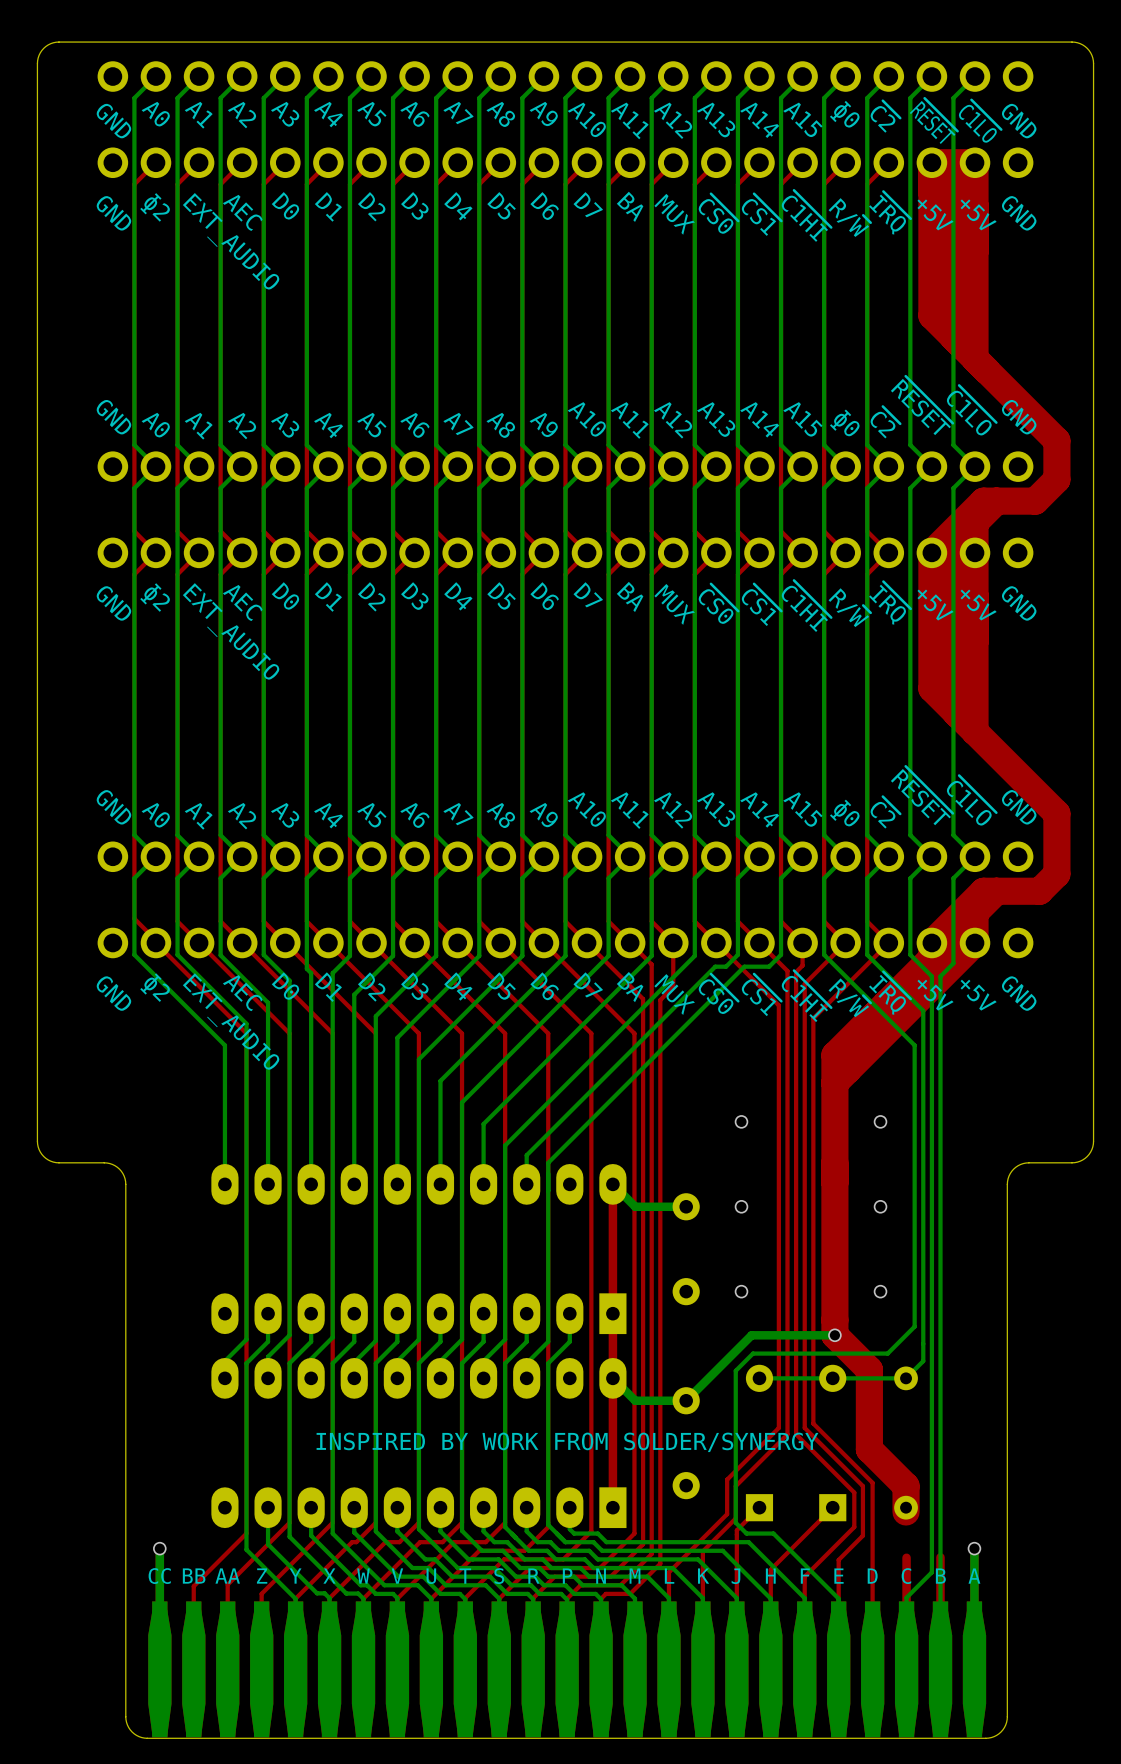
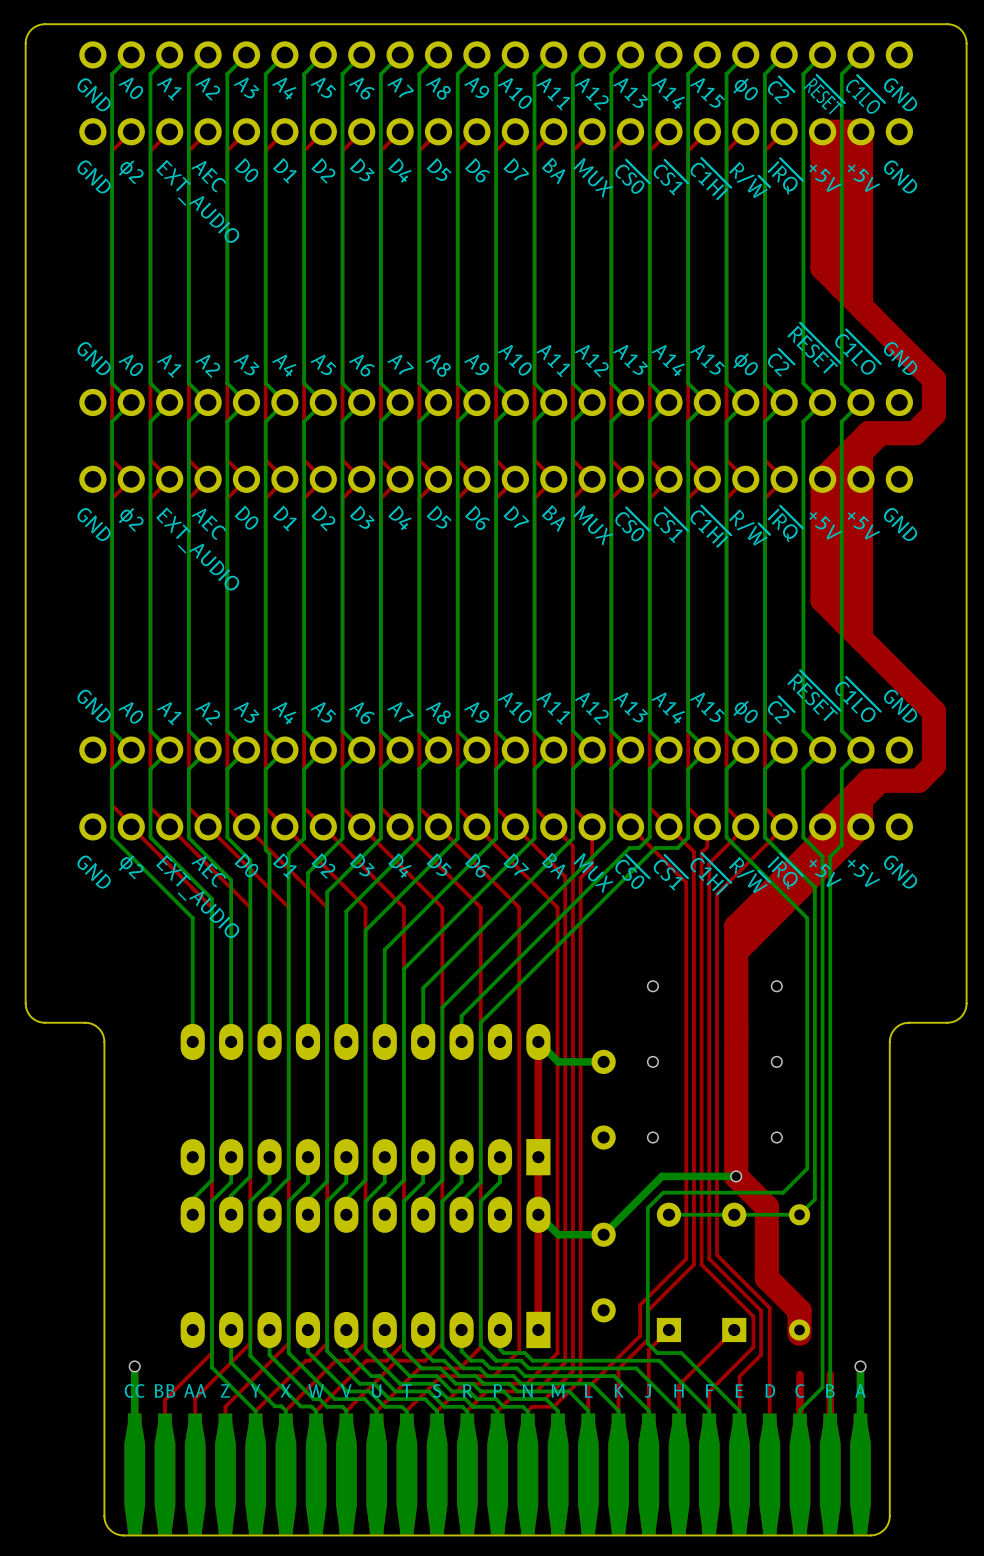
text: INSPIRED BY WORK FROM SOLDER/SYNERGY (567, 1442) -> none

